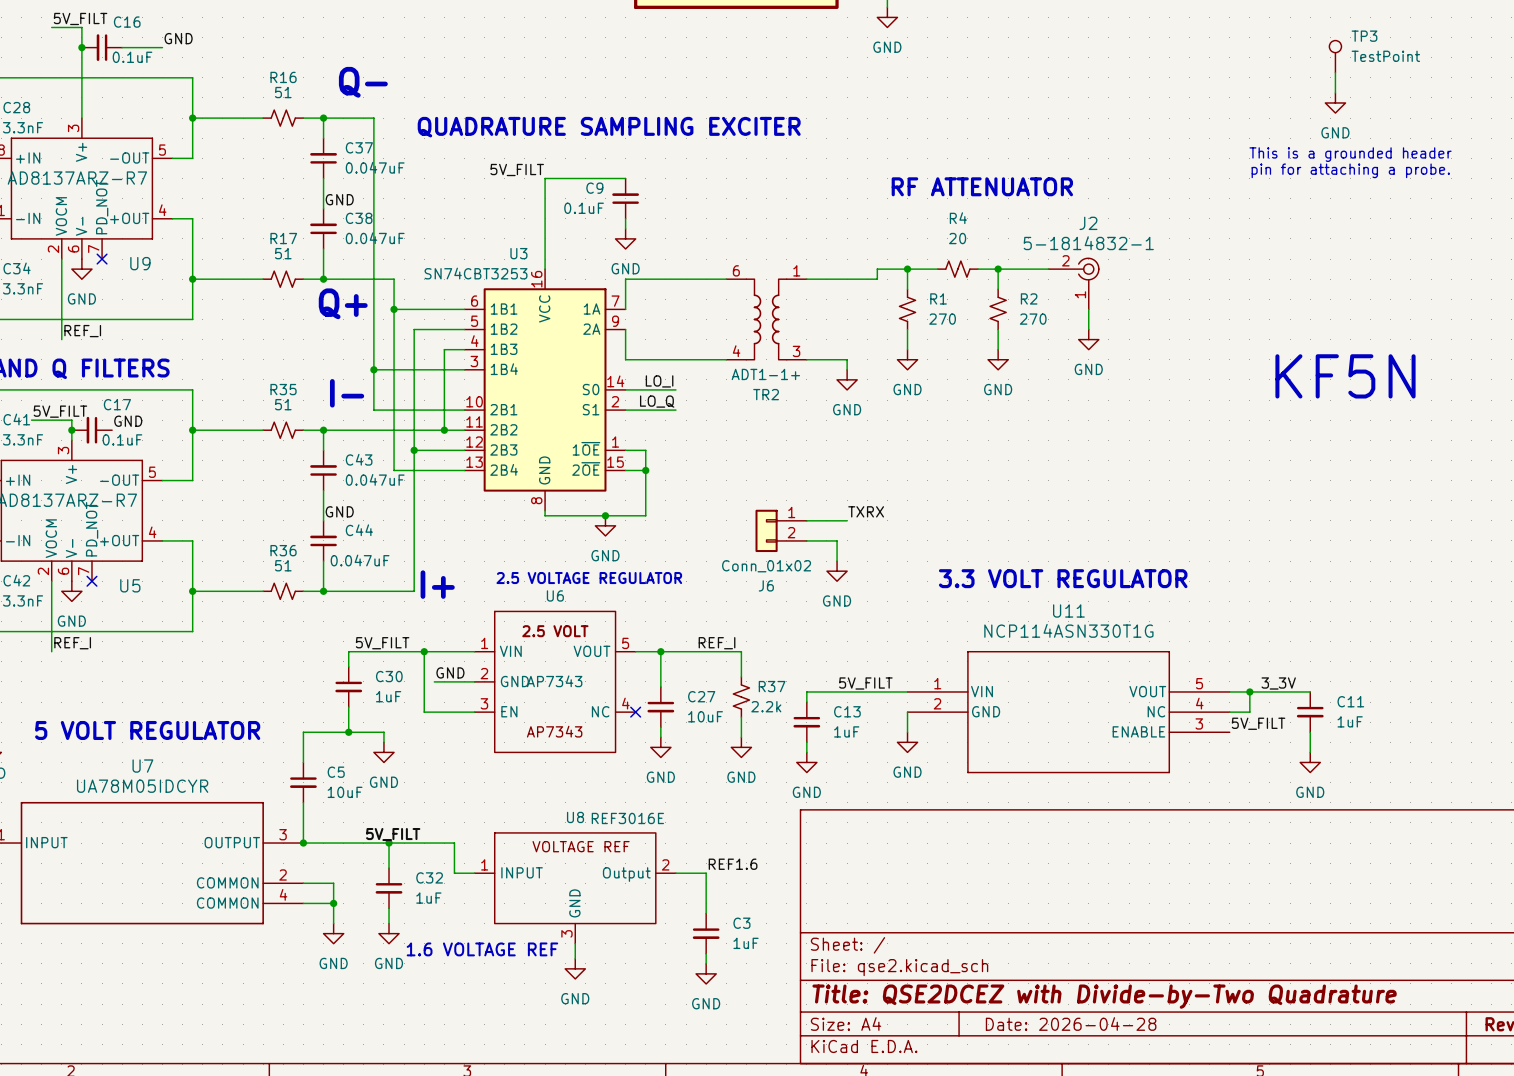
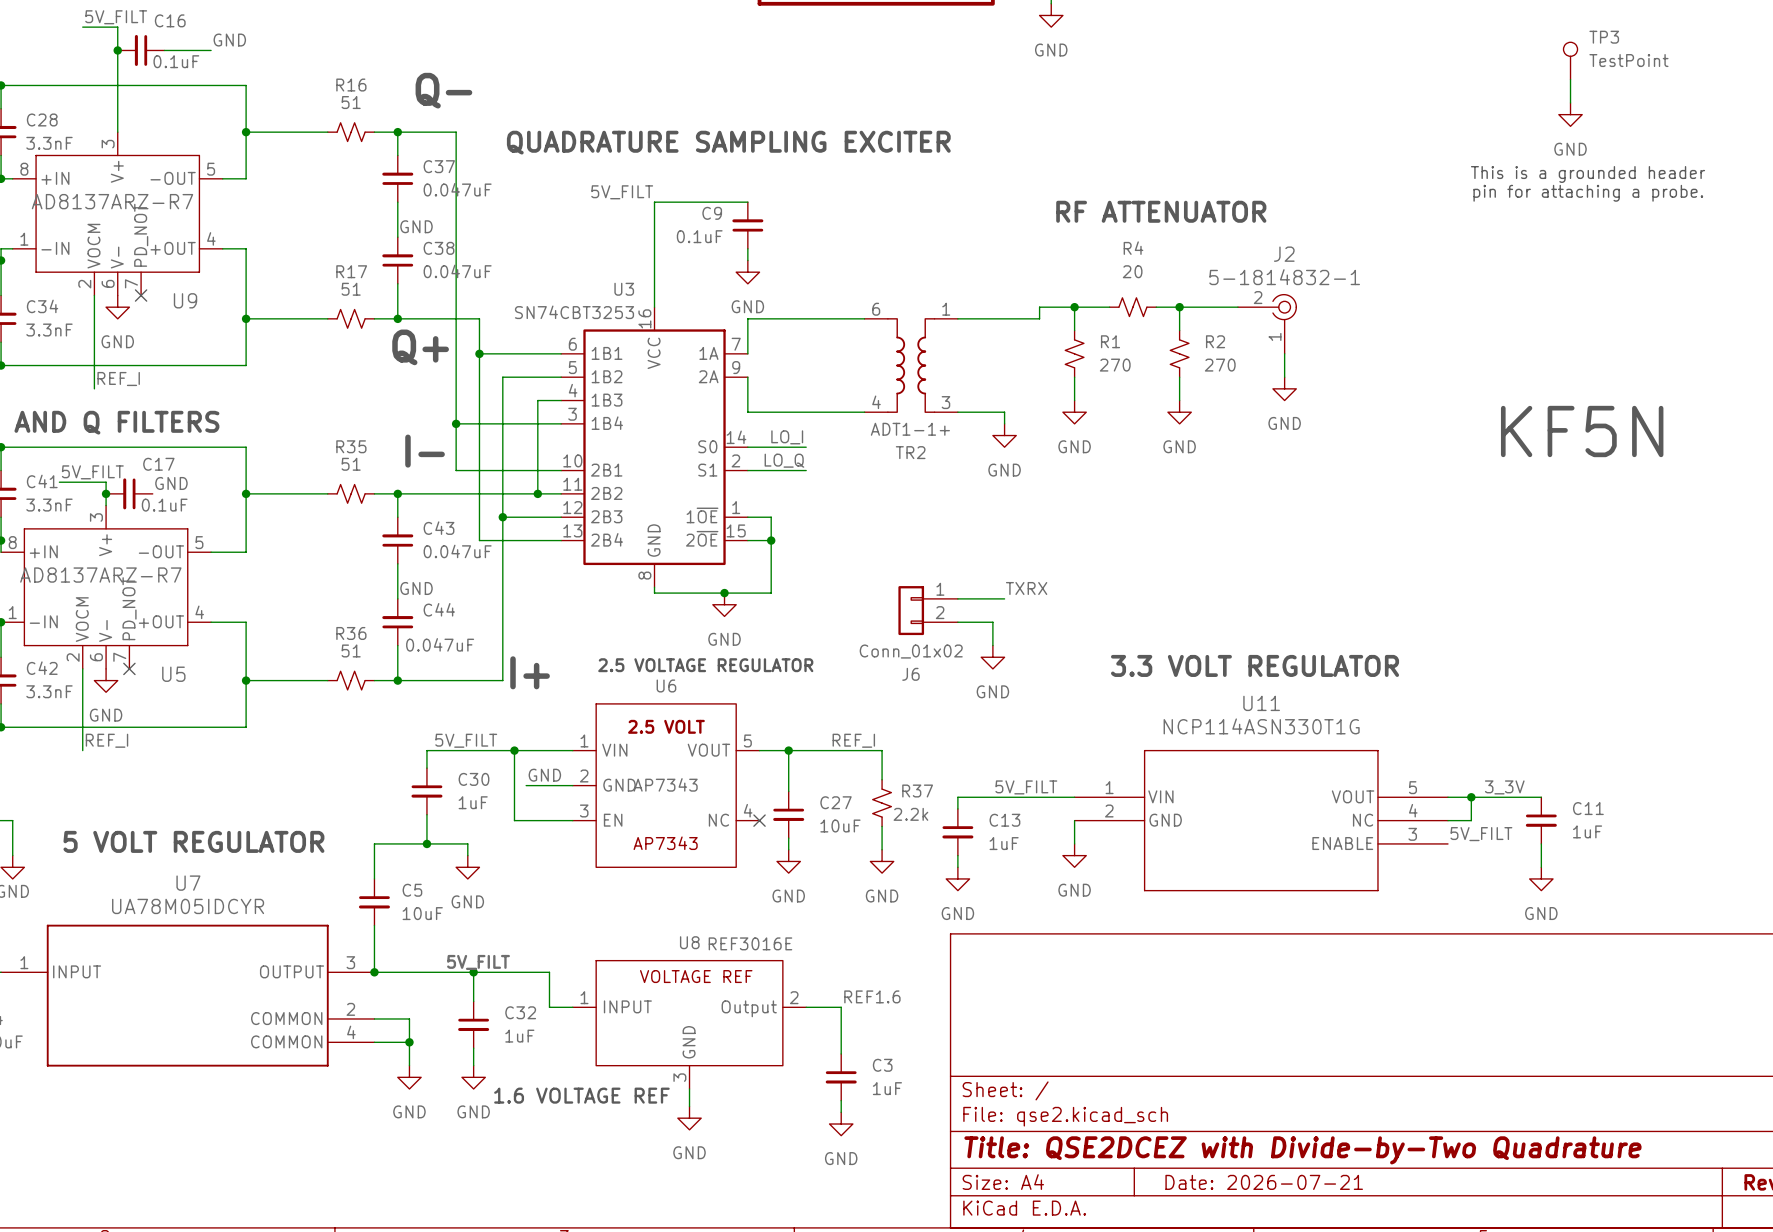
title block: Date: 2026-04-28 (1071, 1023) -> Date: 2026-07-21 (1264, 1182)

